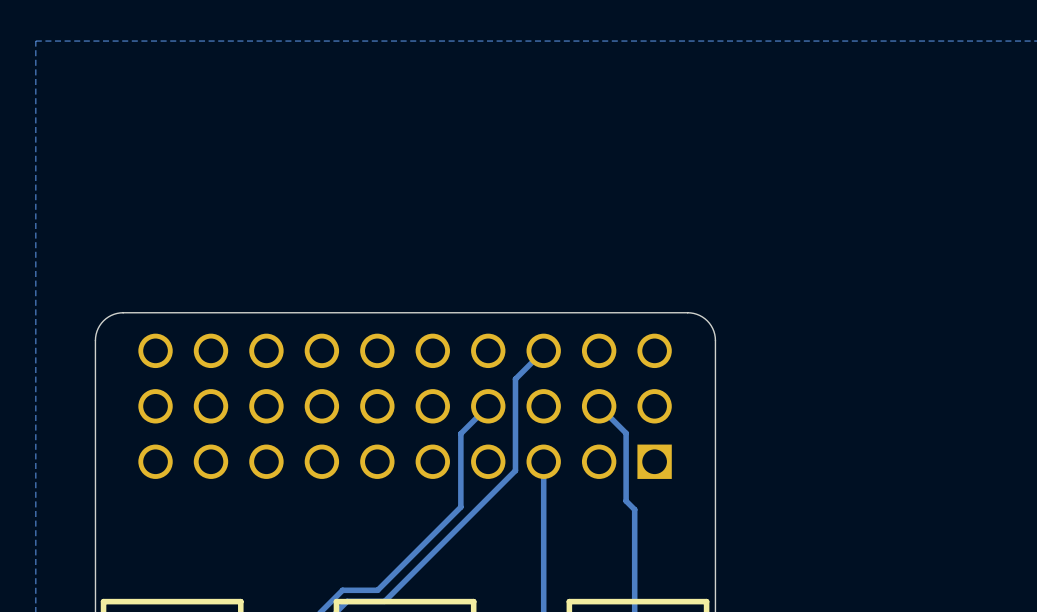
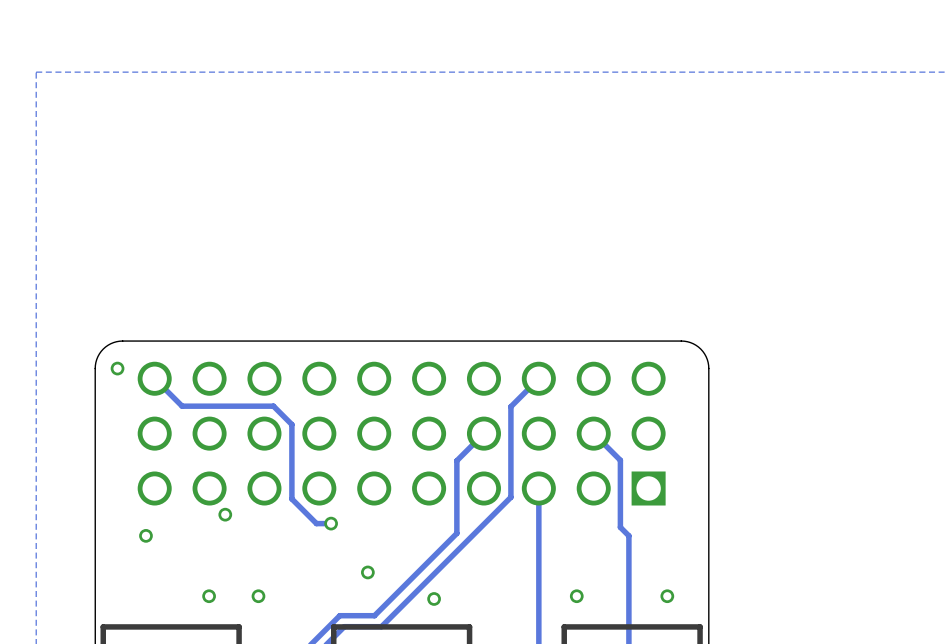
via: none -> (117, 368)
track: none -> (154, 378) (182, 406) (273, 406) (291, 424) (291, 498) (316, 523) (331, 523)
via: none -> (225, 514)
via: none -> (331, 523)
via: none -> (145, 535)
via: none -> (367, 572)
via: none -> (209, 596)
via: none -> (258, 596)
via: none -> (576, 596)
via: none -> (667, 596)
via: none -> (434, 598)

